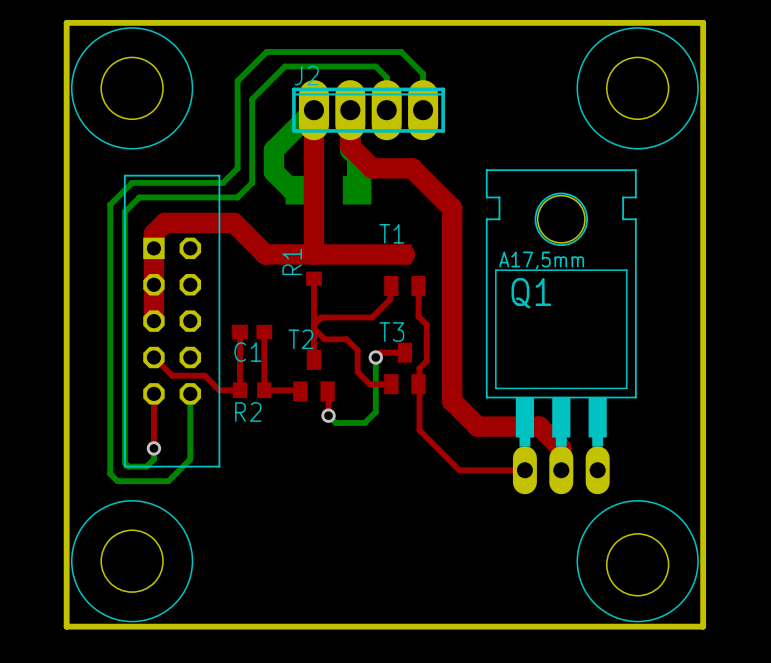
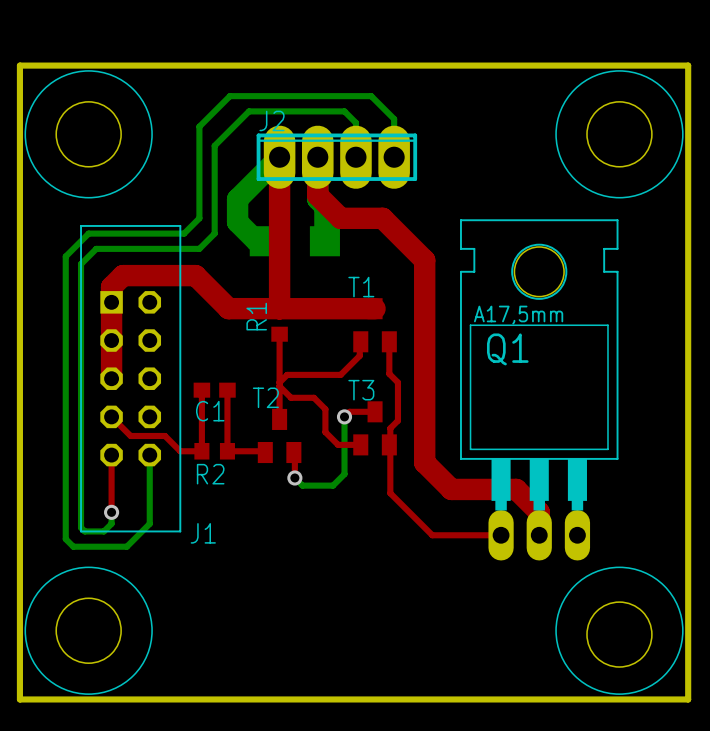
J1 name: none -> J1 (203, 533)

